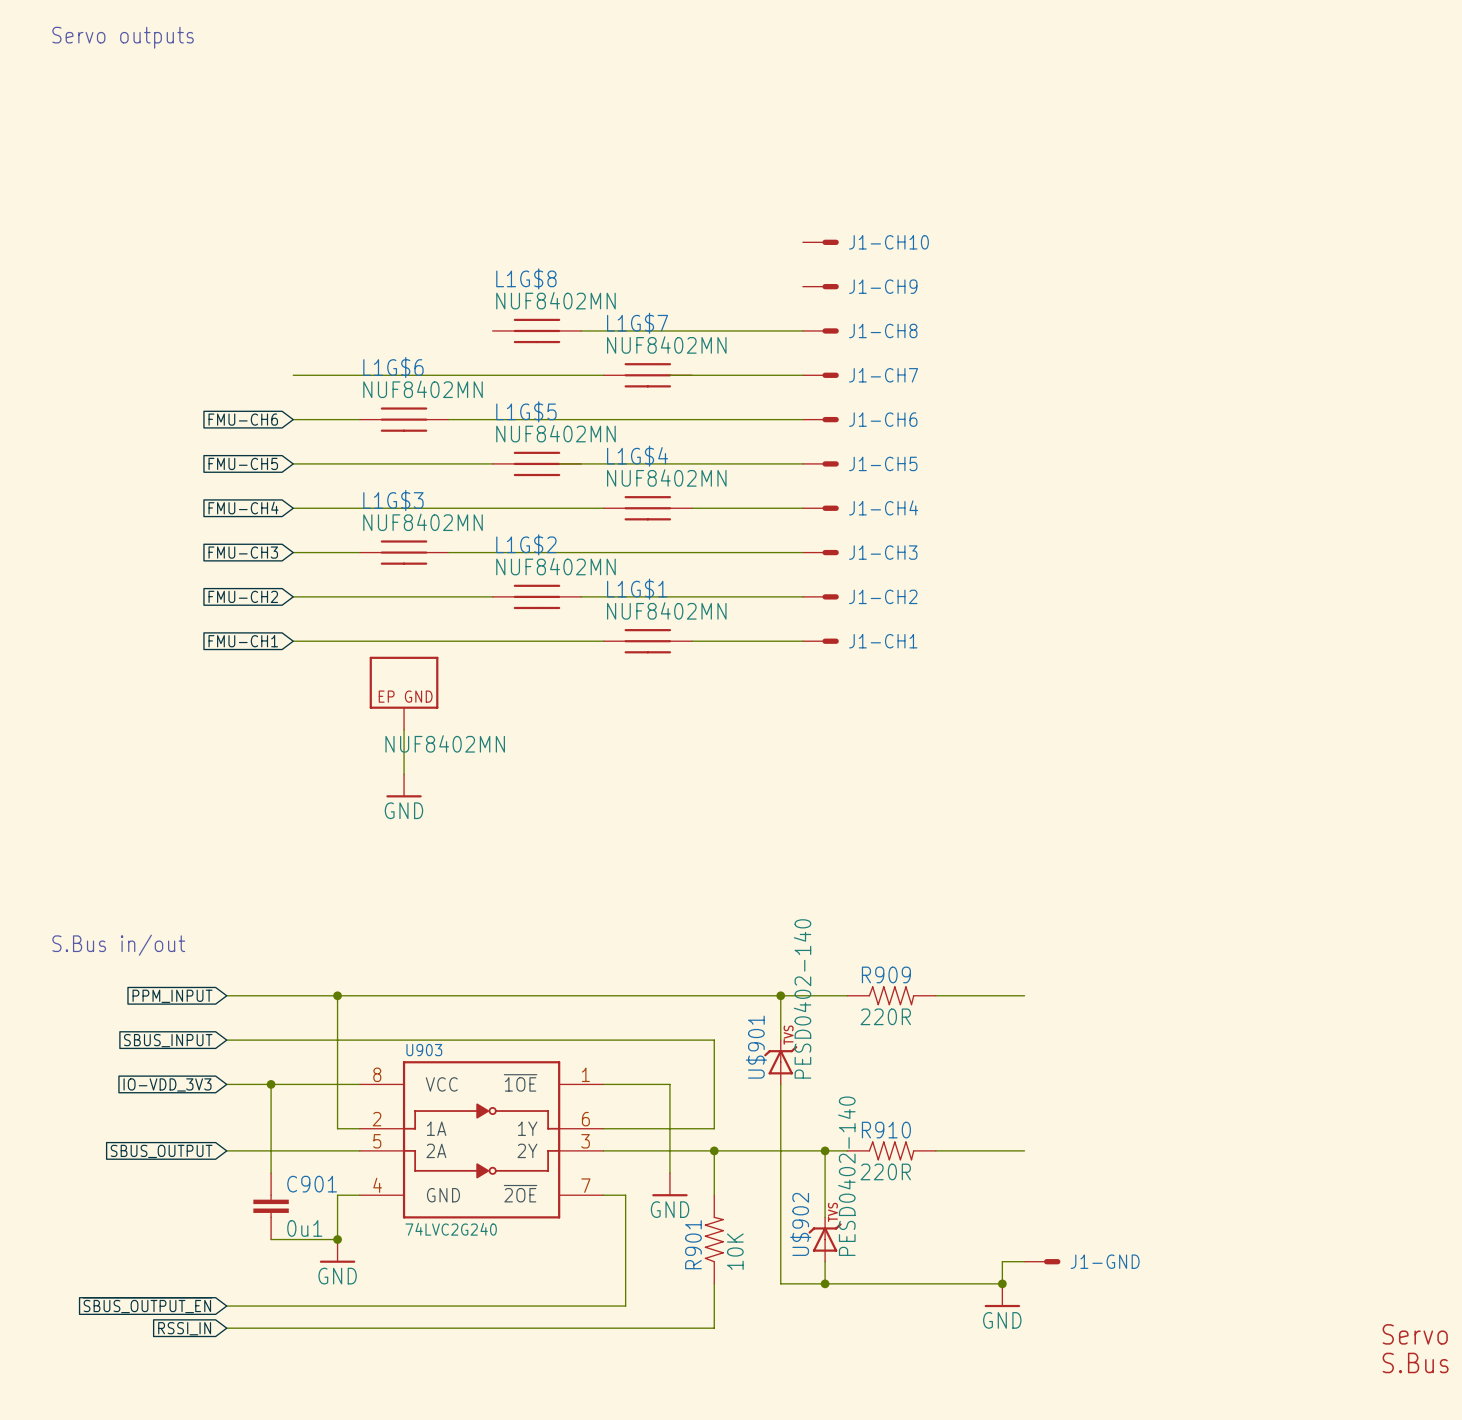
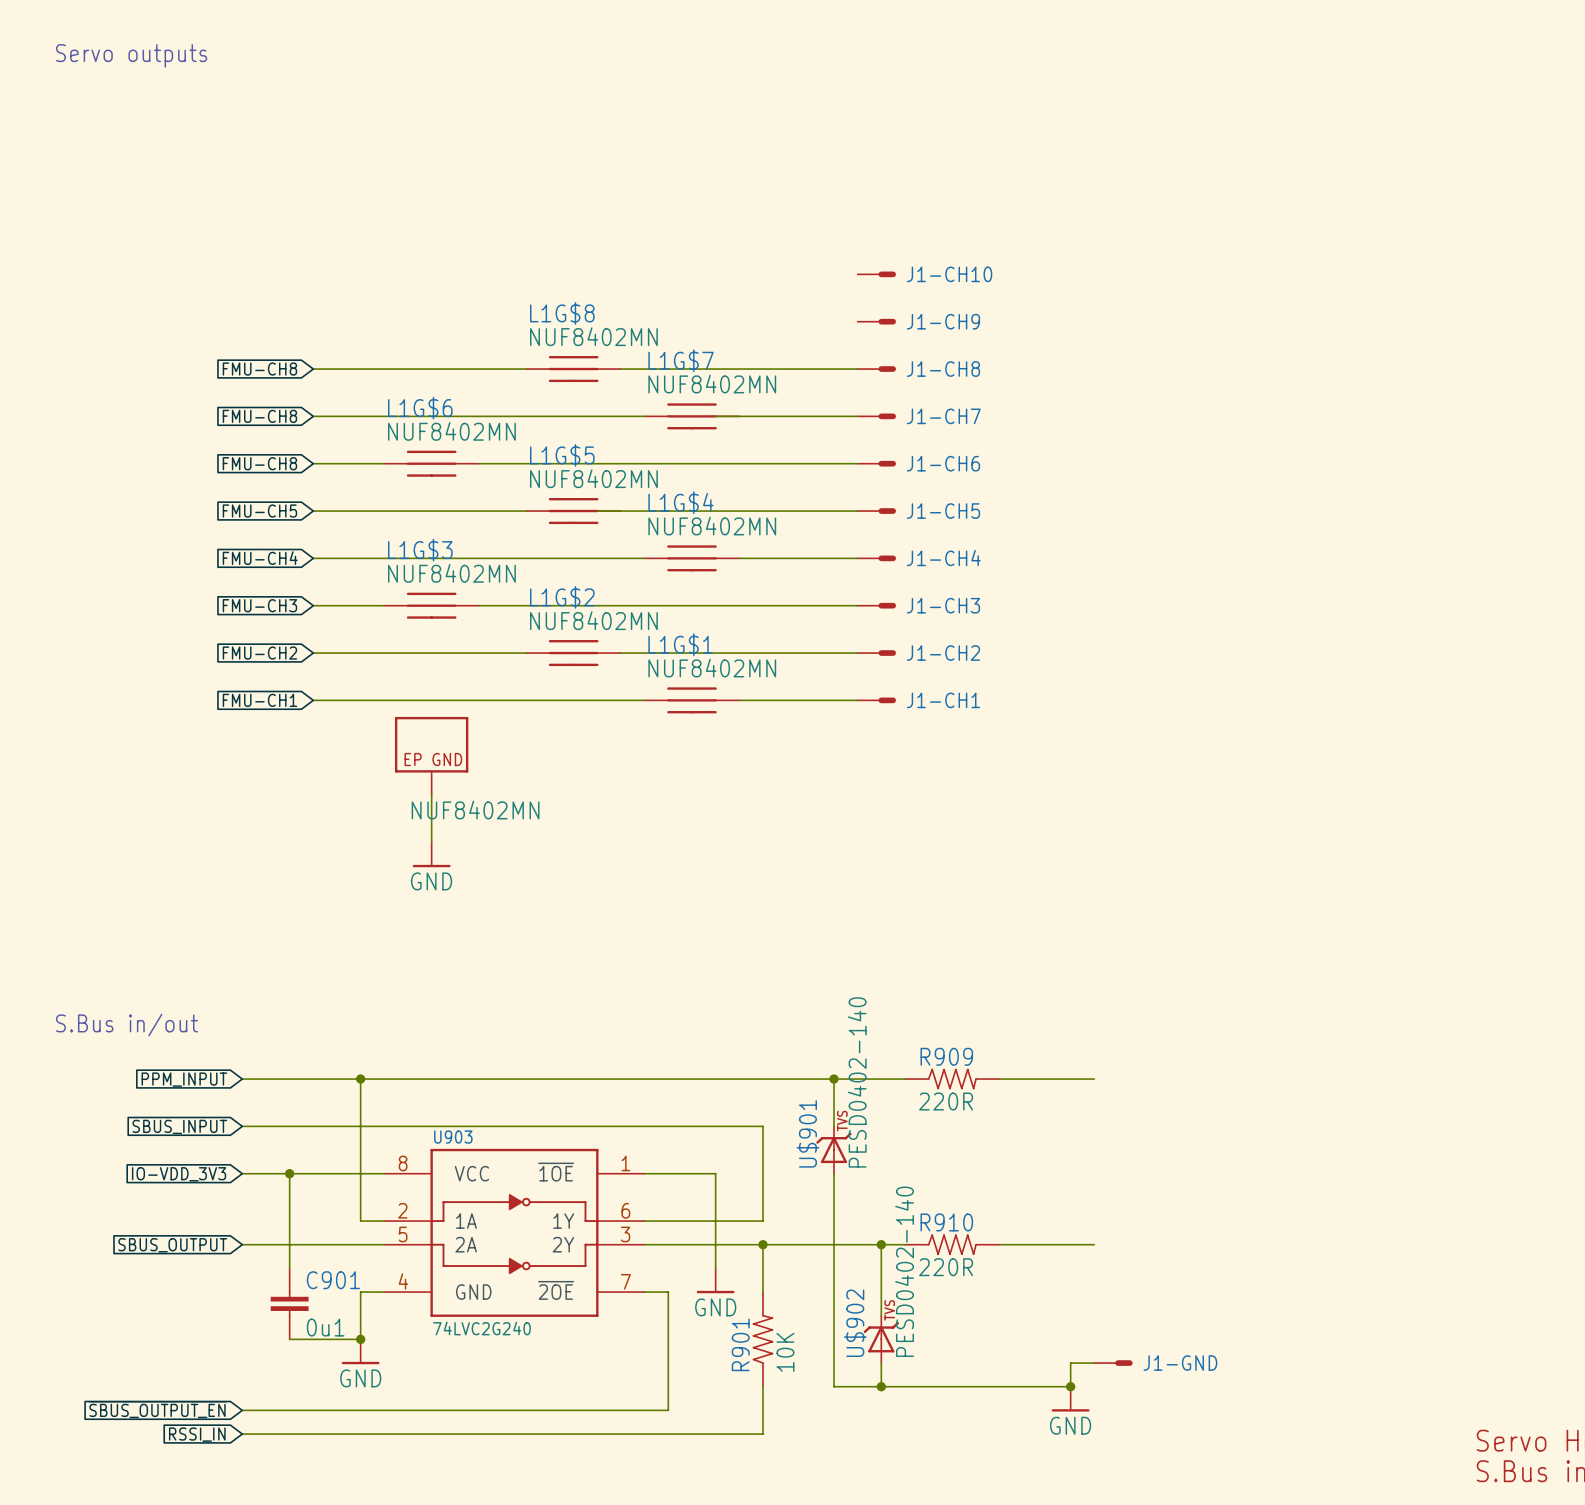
global label: none -> FMU-CH8 (259, 369)
wire: none -> (313, 369) (526, 369)
global label: none -> FMU-CH8 (259, 416)
global label: FMU-CH6 (243, 419) -> FMU-CH8 (259, 463)

